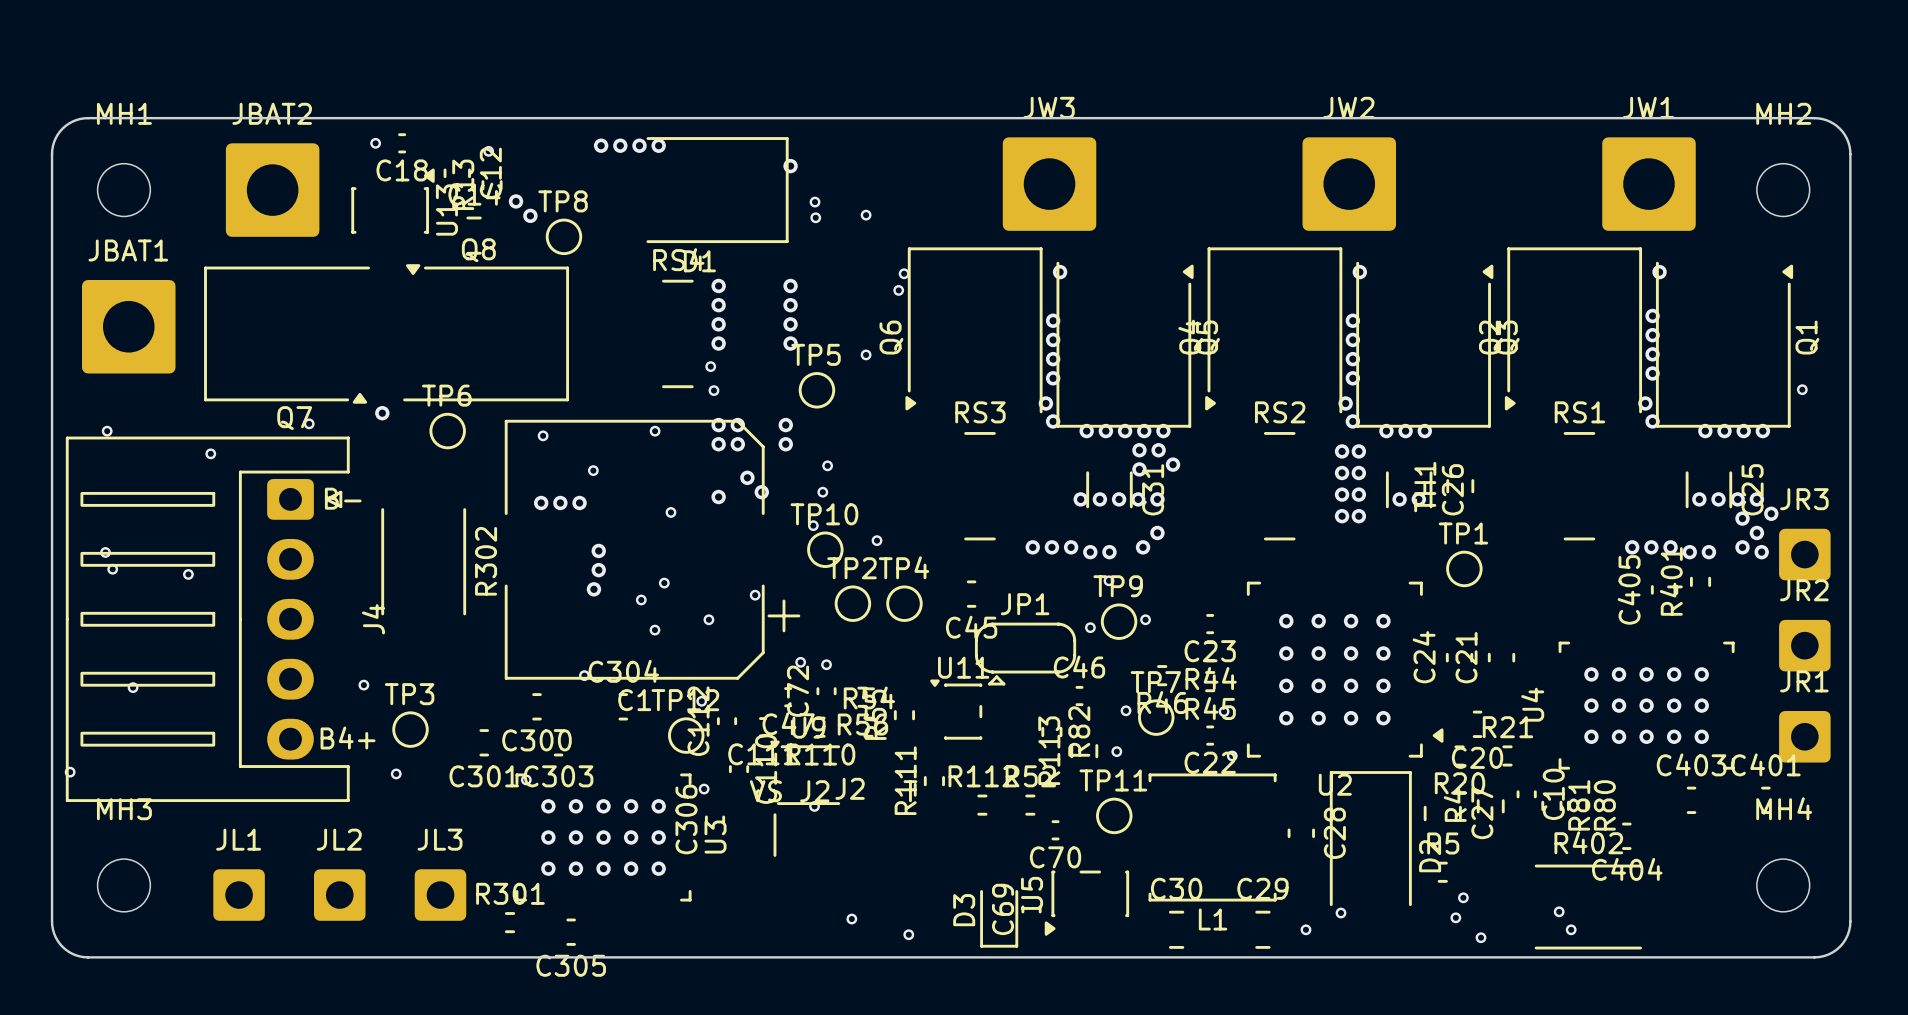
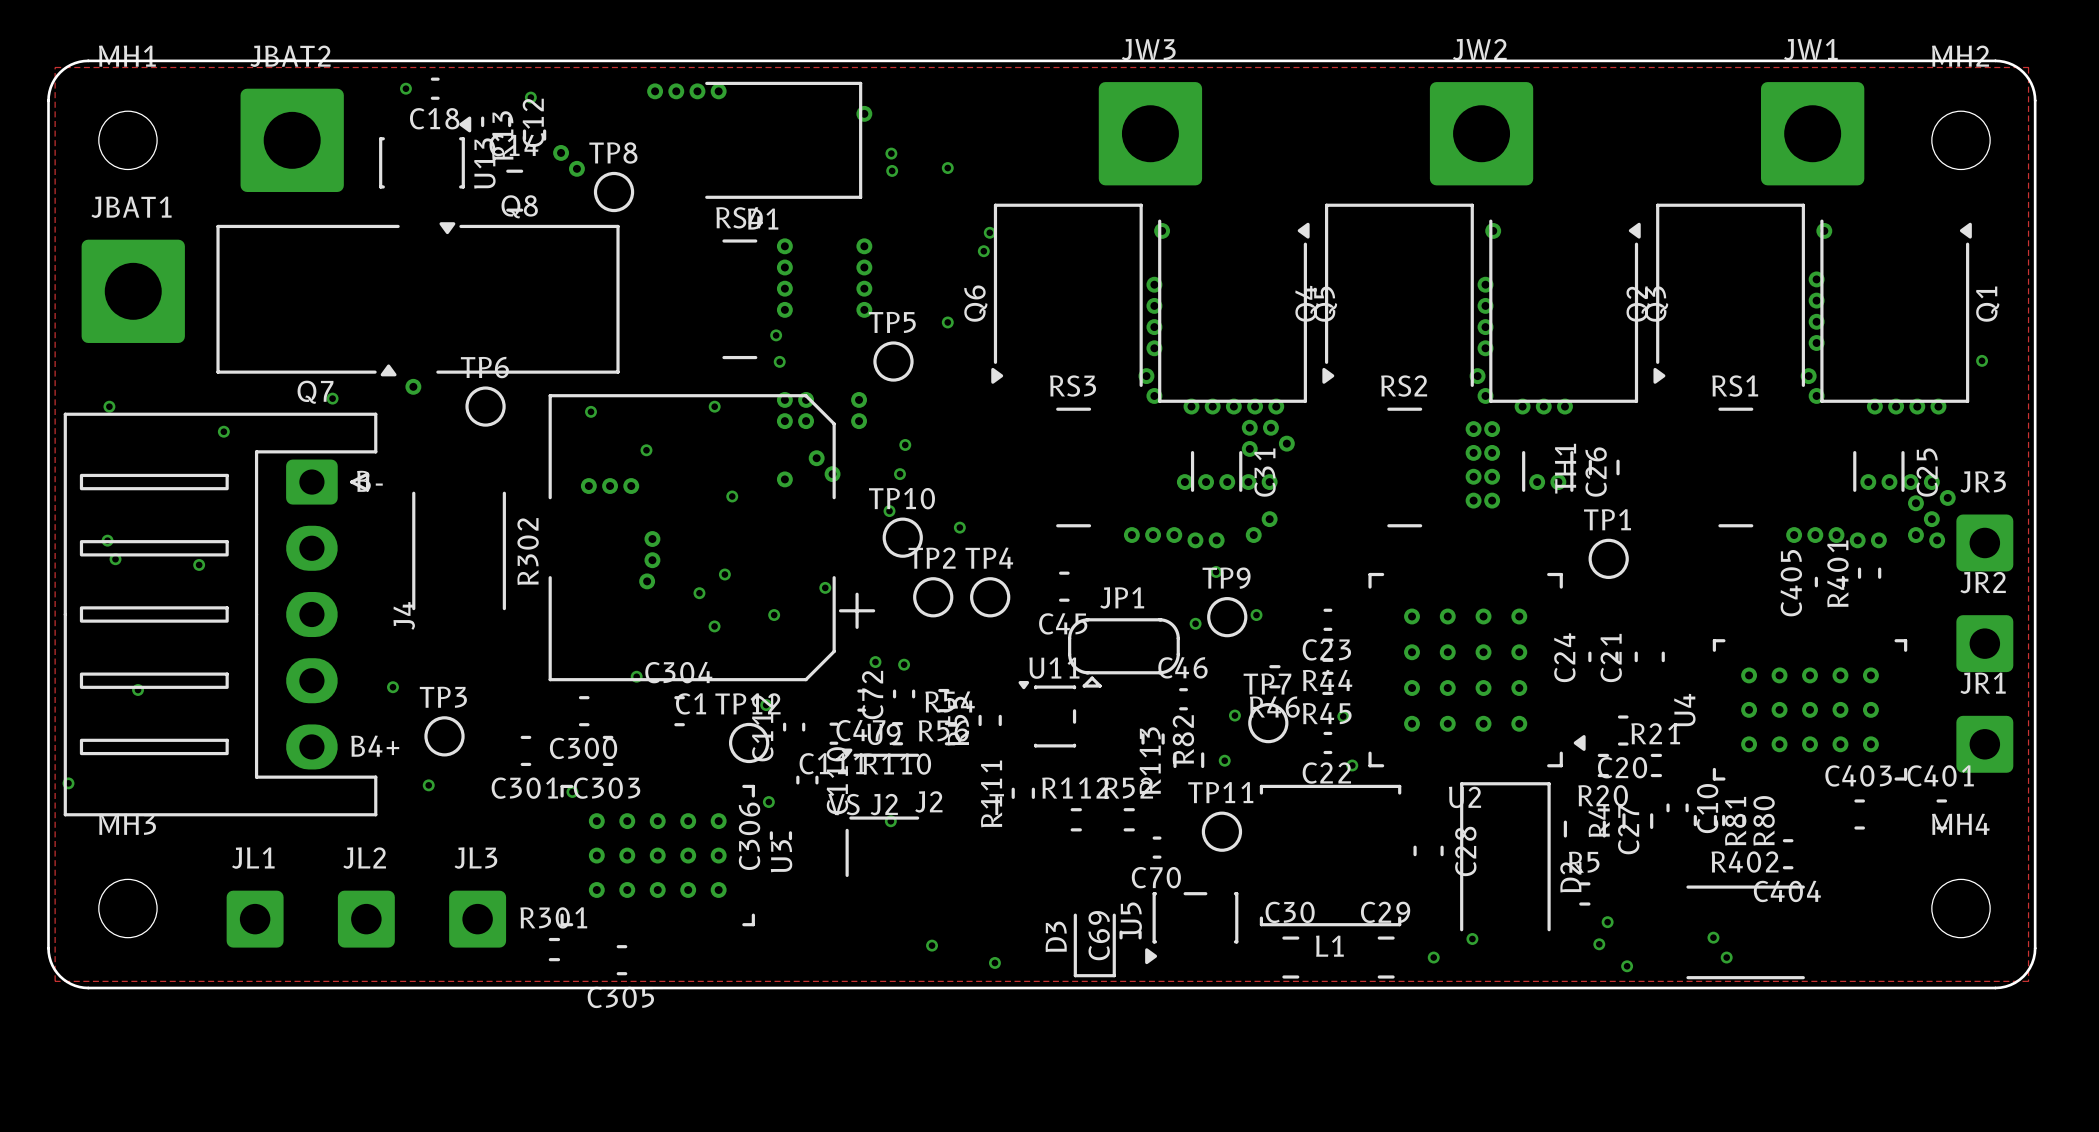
zone outline: none -> (55, 67) (2028, 67) (2028, 981) (55, 981) (55, 67)

